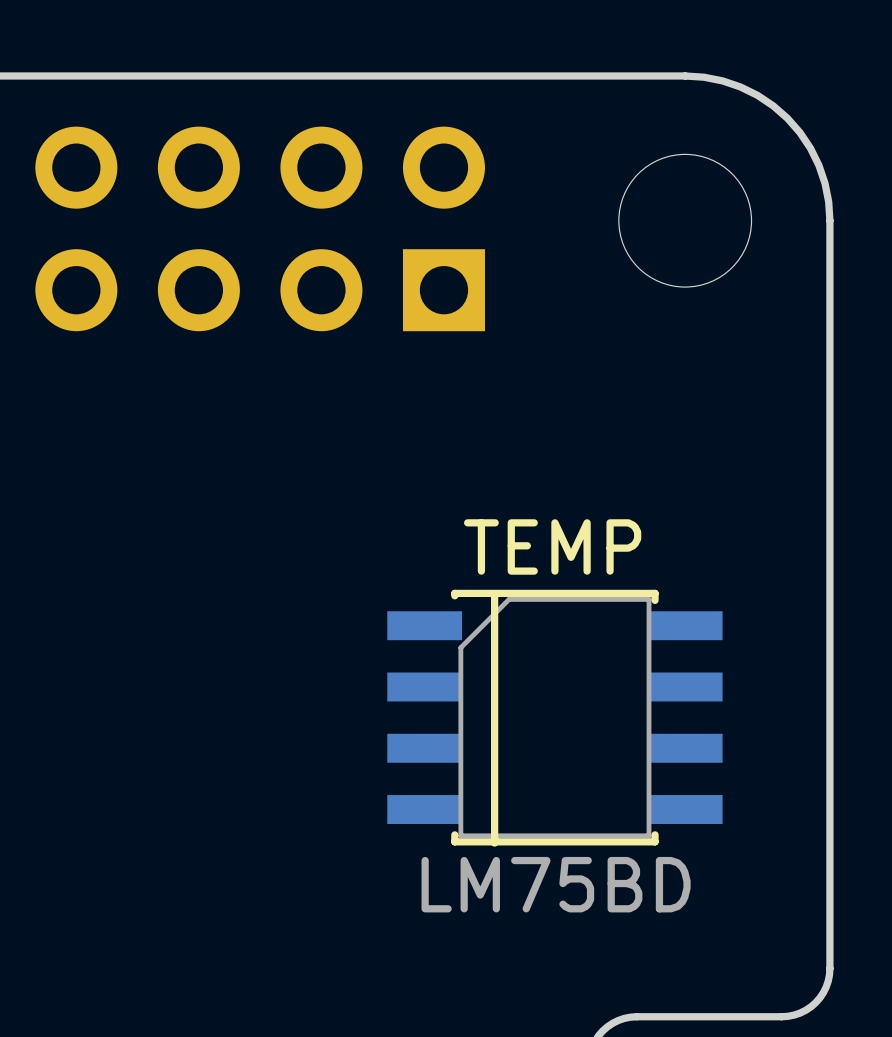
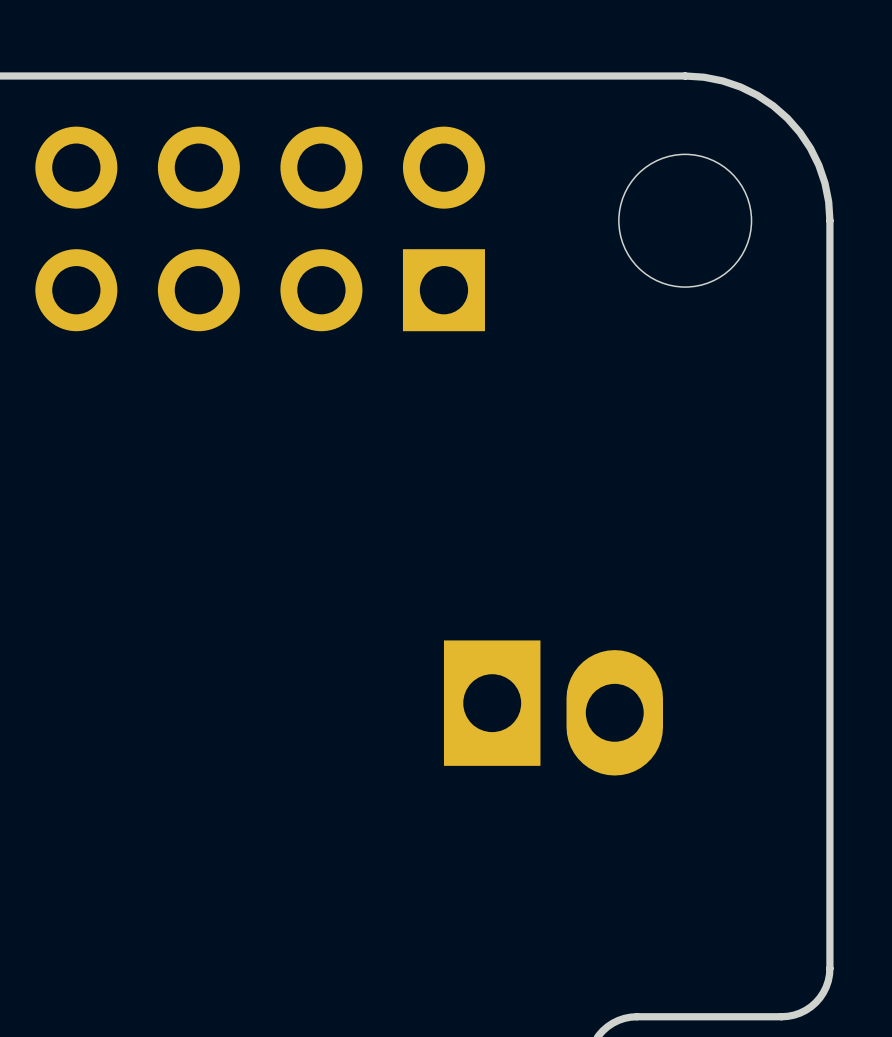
part: none -> (553, 707)
TEMP: LM75BD (554, 718) -> none

